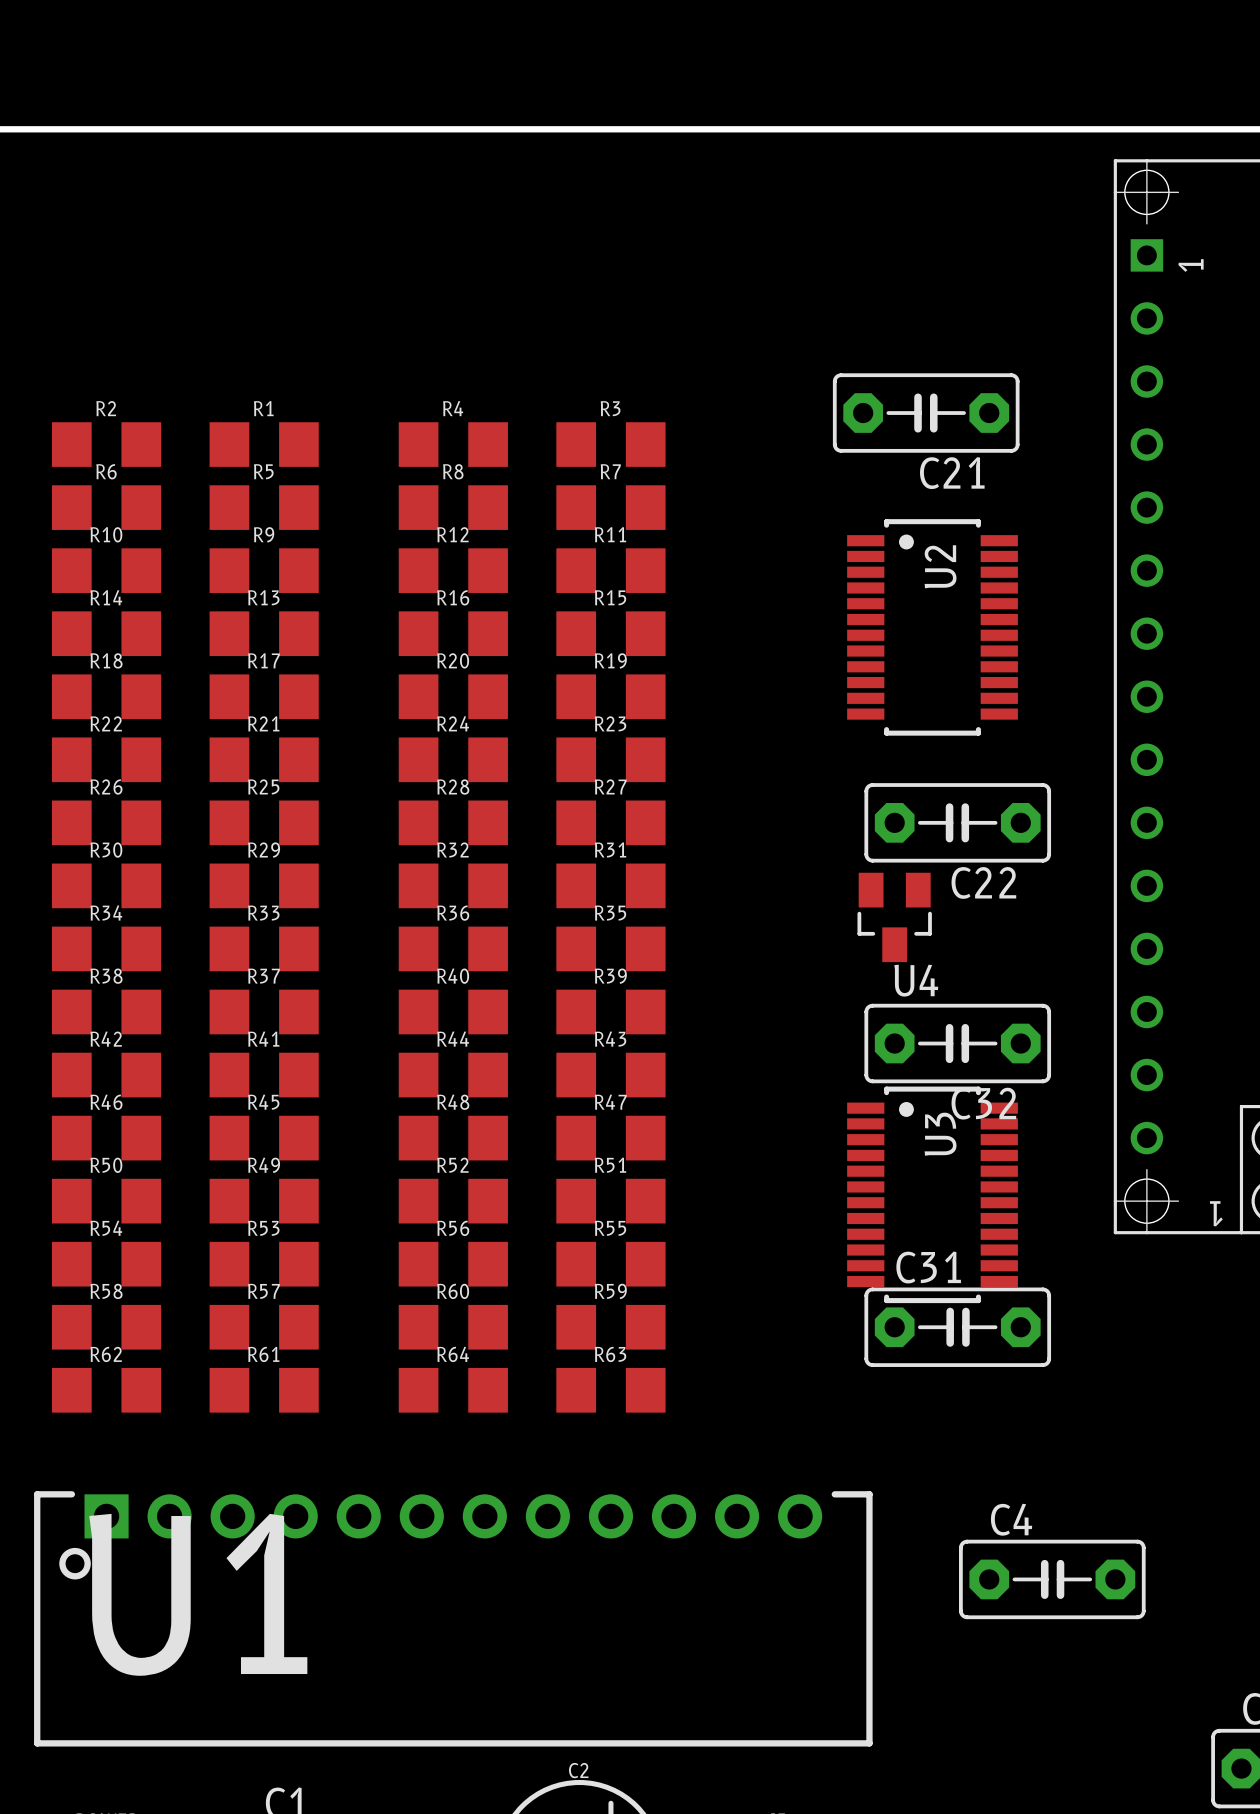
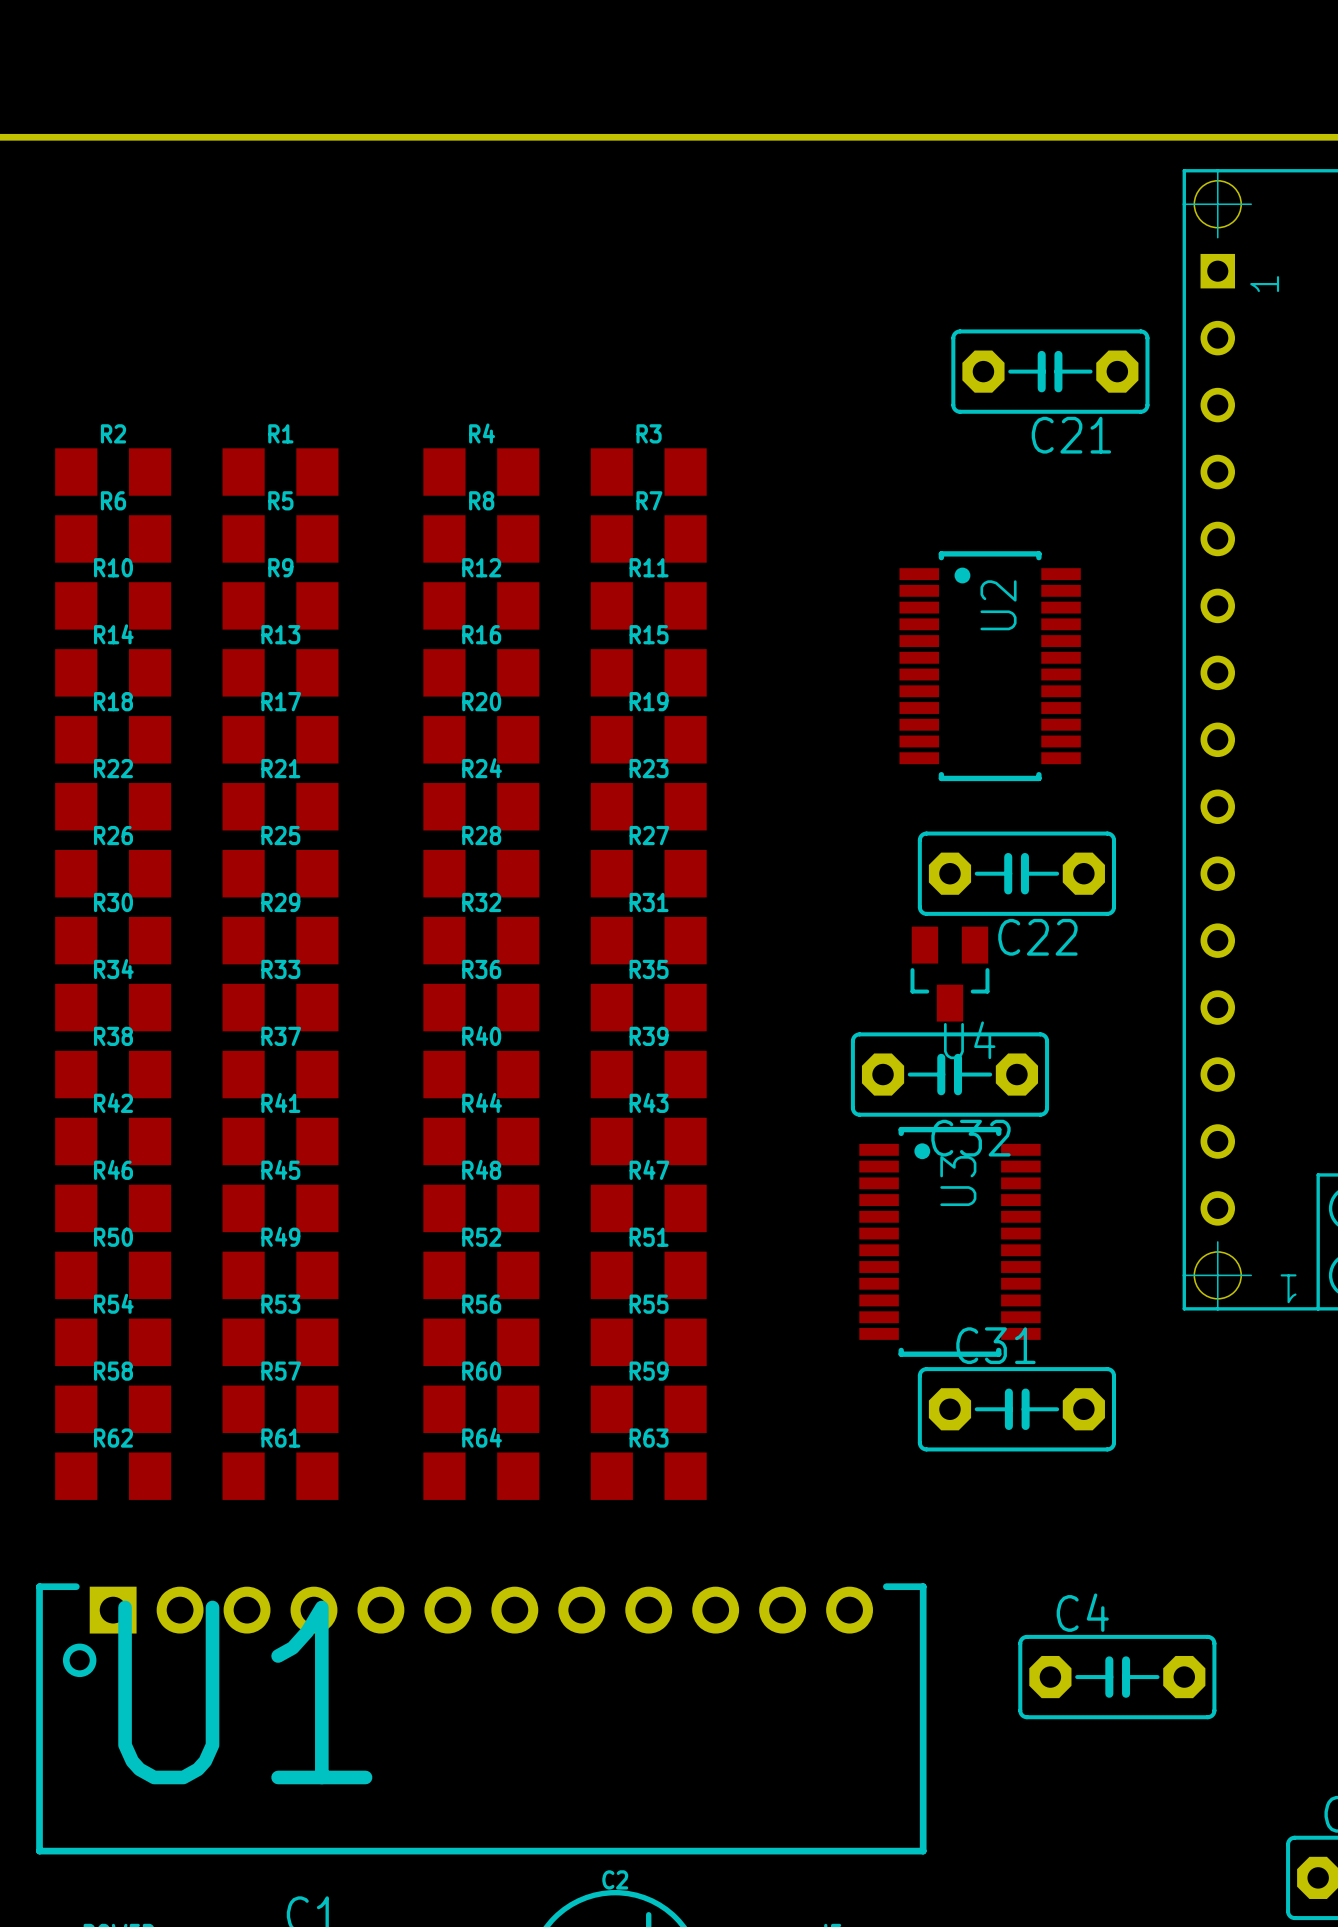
C21 position: (926, 413) -> (1050, 371)
C32 position: (957, 1043) -> (949, 1074)
U3 position: (932, 1194) -> (949, 1241)

